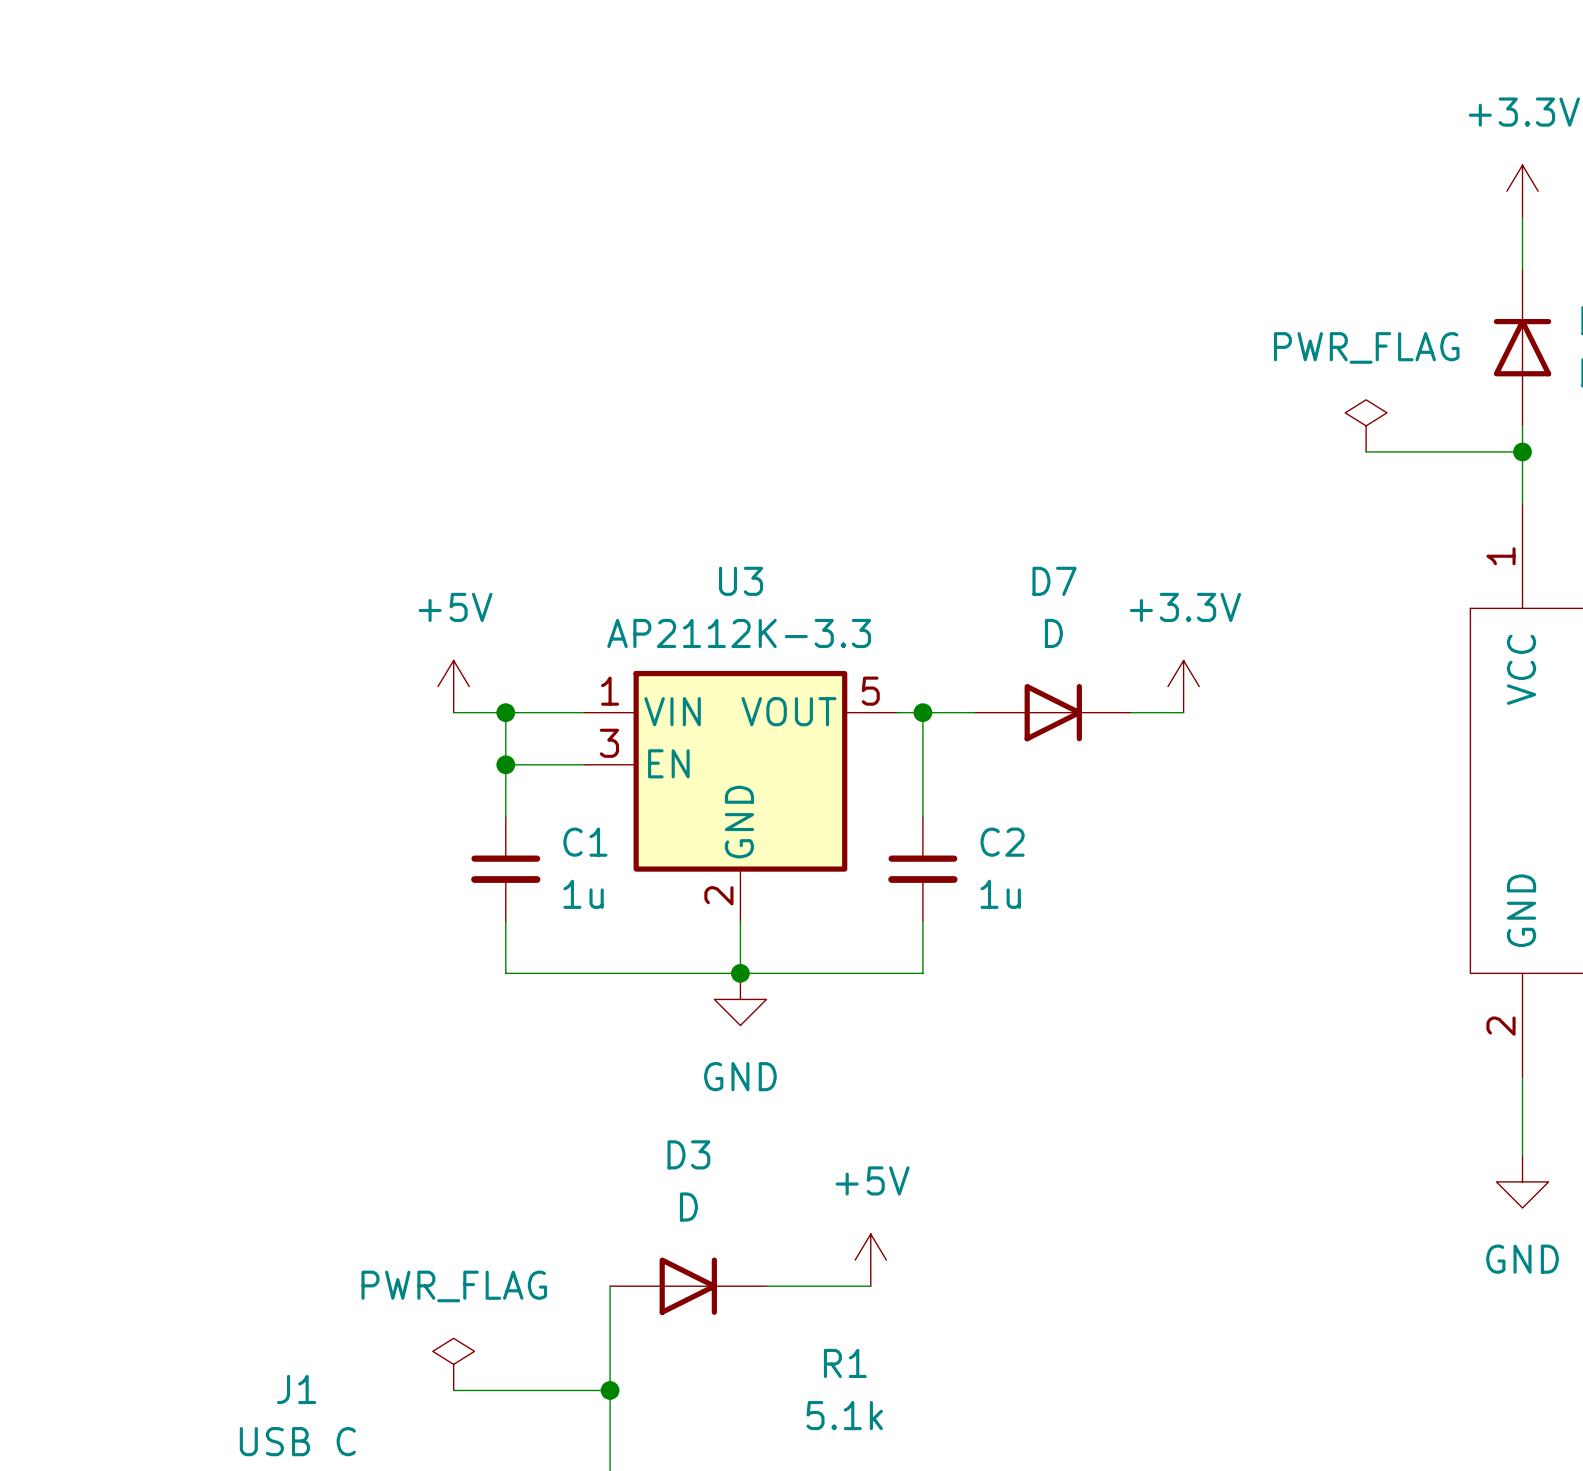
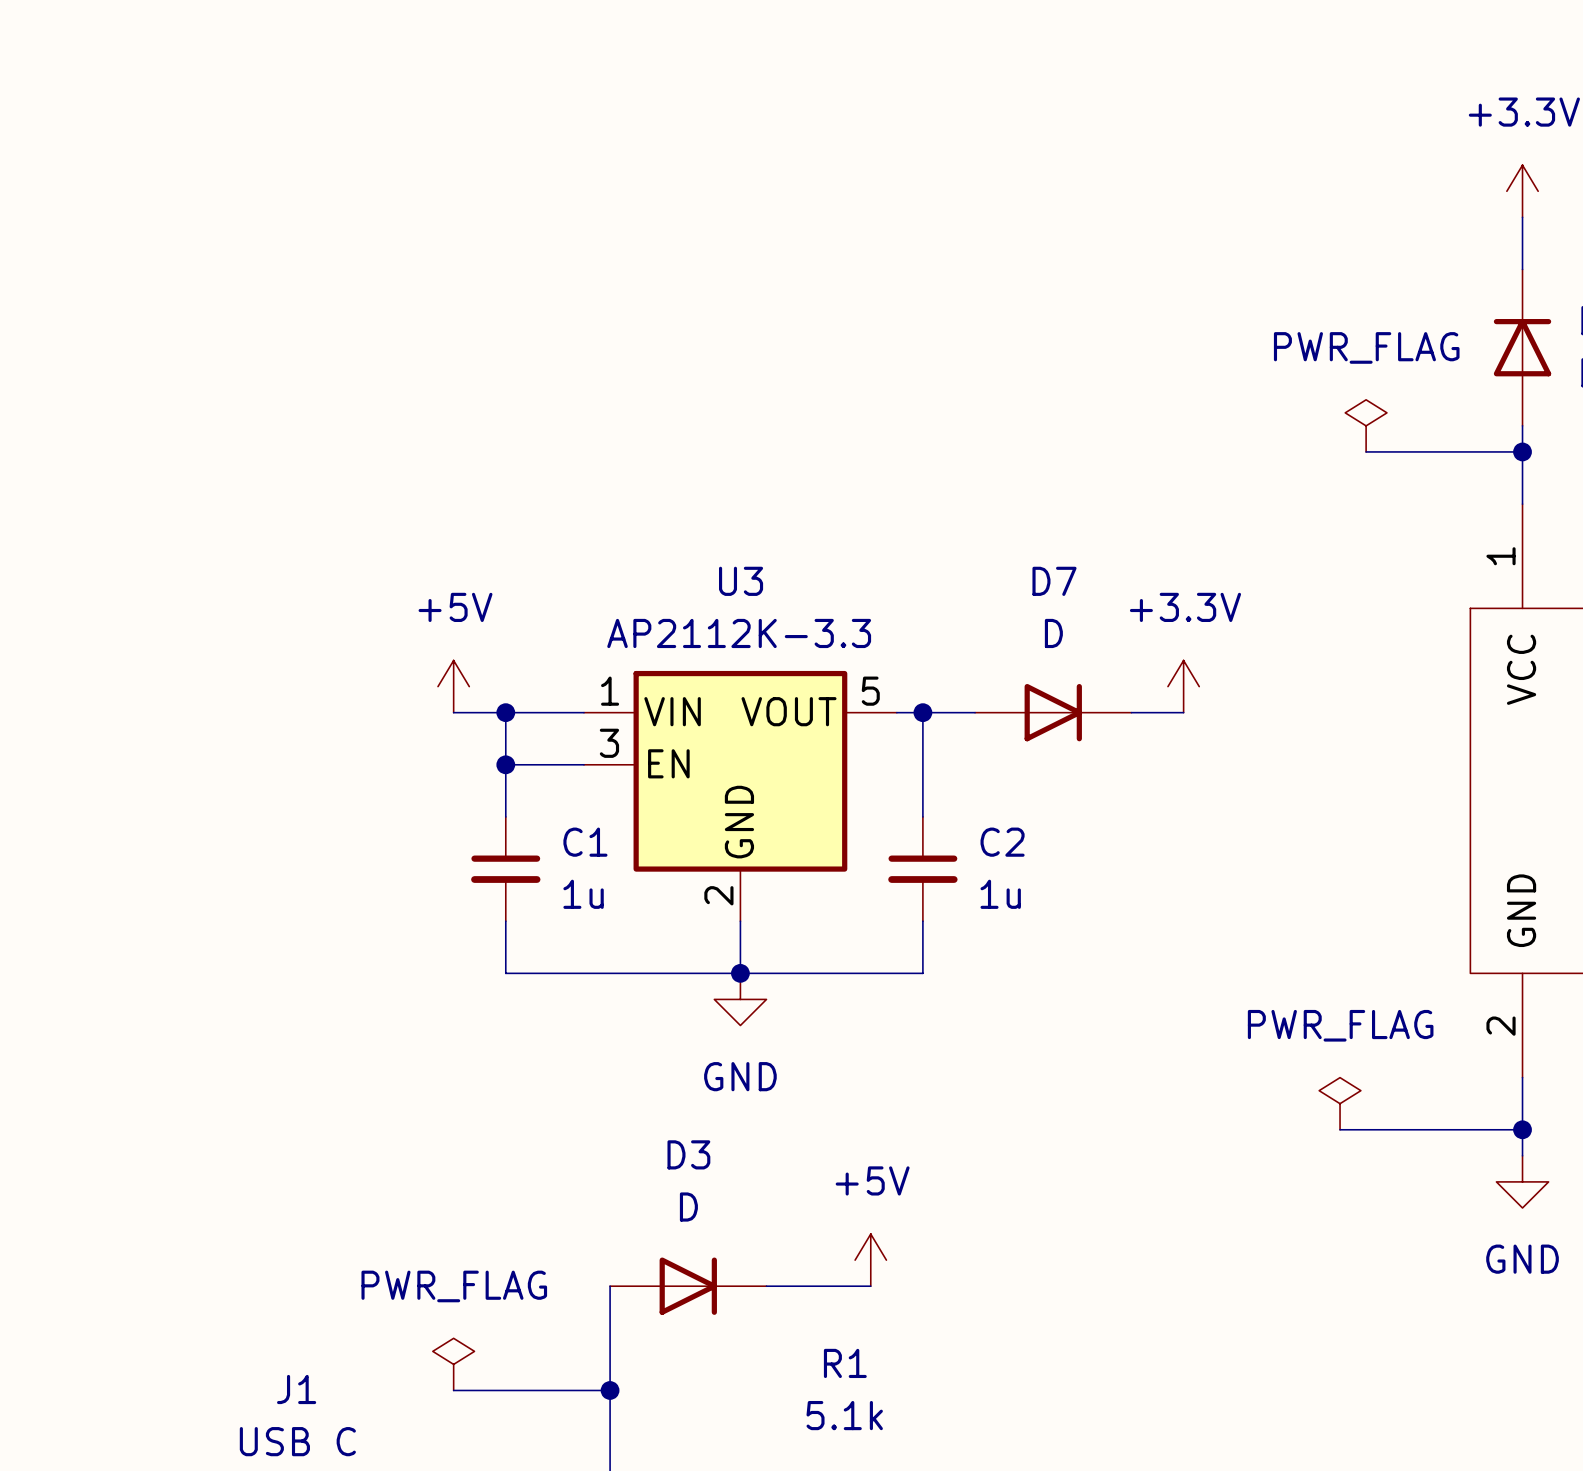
power symbol: none -> PWR_FLAG (1340, 1103)
wire: none -> (1340, 1129) (1522, 1129)
junction: none -> (1522, 1129)

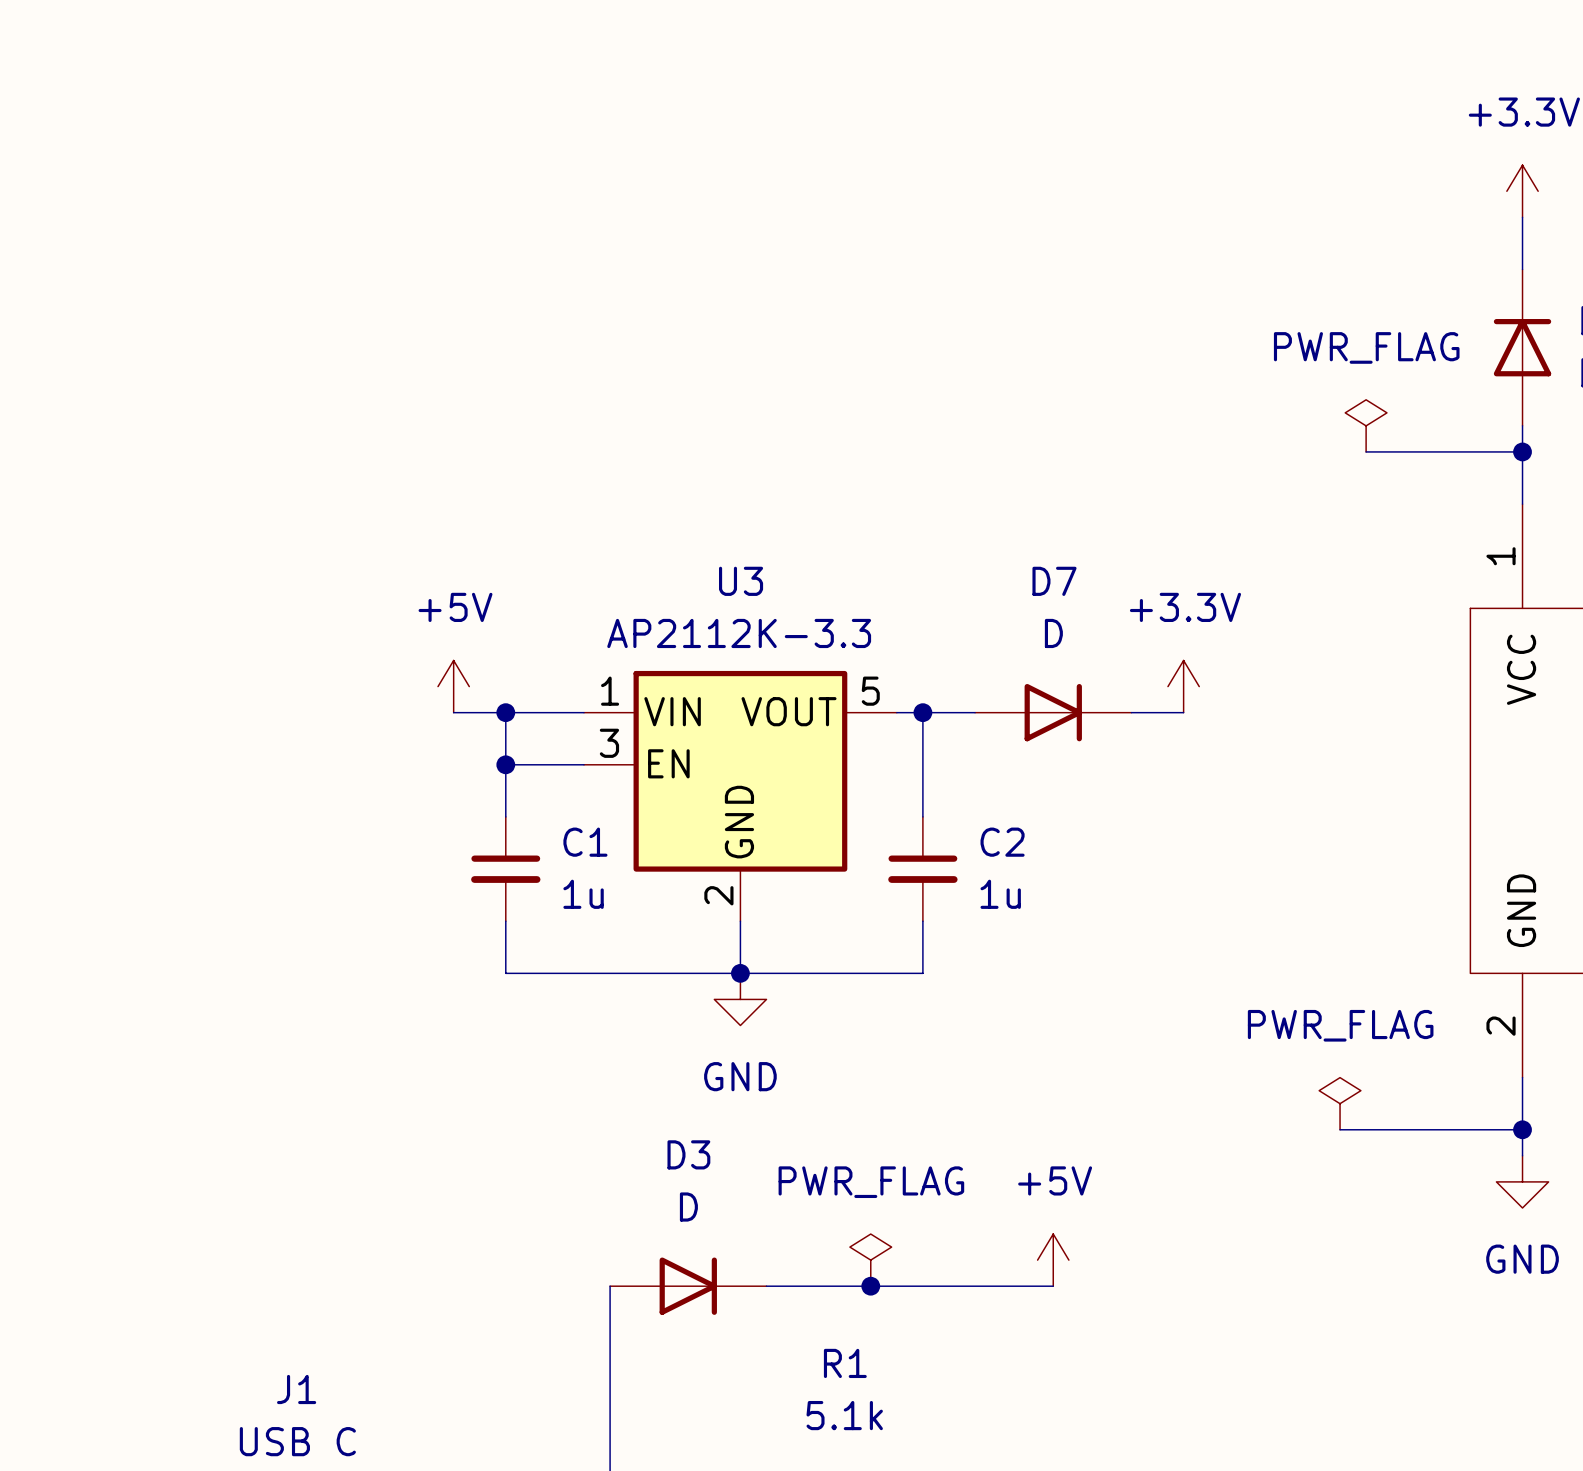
power symbol: +5V (870, 1260) -> PWR_FLAG (870, 1260)
power symbol: none -> +5V (1053, 1260)
wire: none -> (870, 1286) (1053, 1286)
junction: none -> (870, 1286)
power symbol: PWR_FLAG (453, 1364) -> none
wire: (453, 1390) (610, 1390) -> none
junction: (610, 1390) -> none

